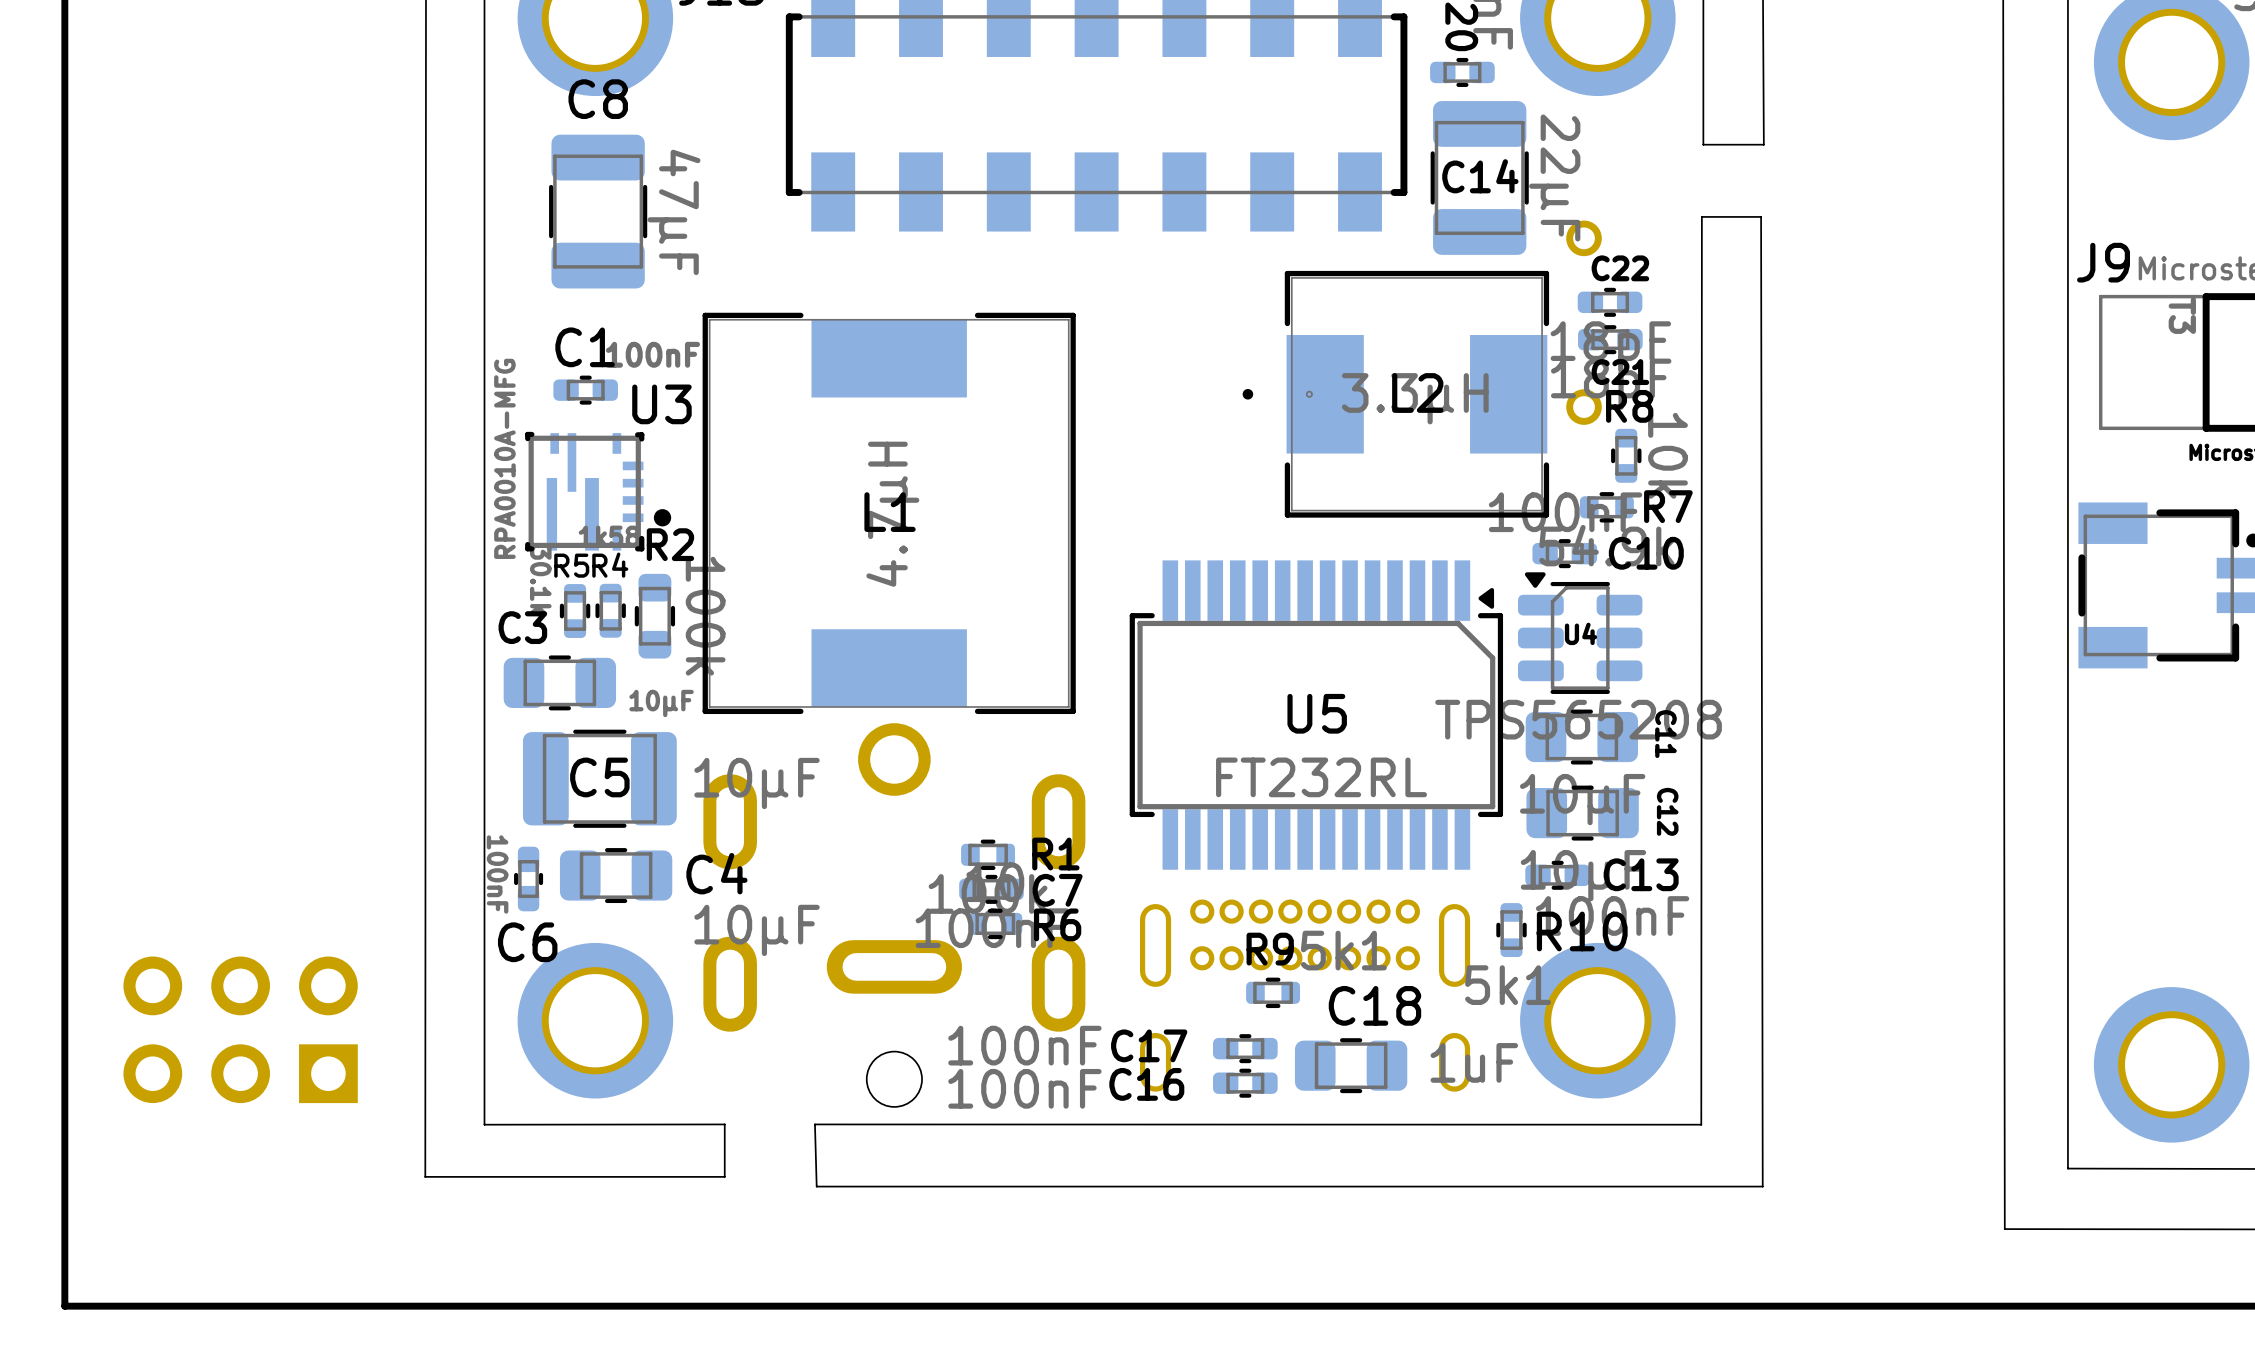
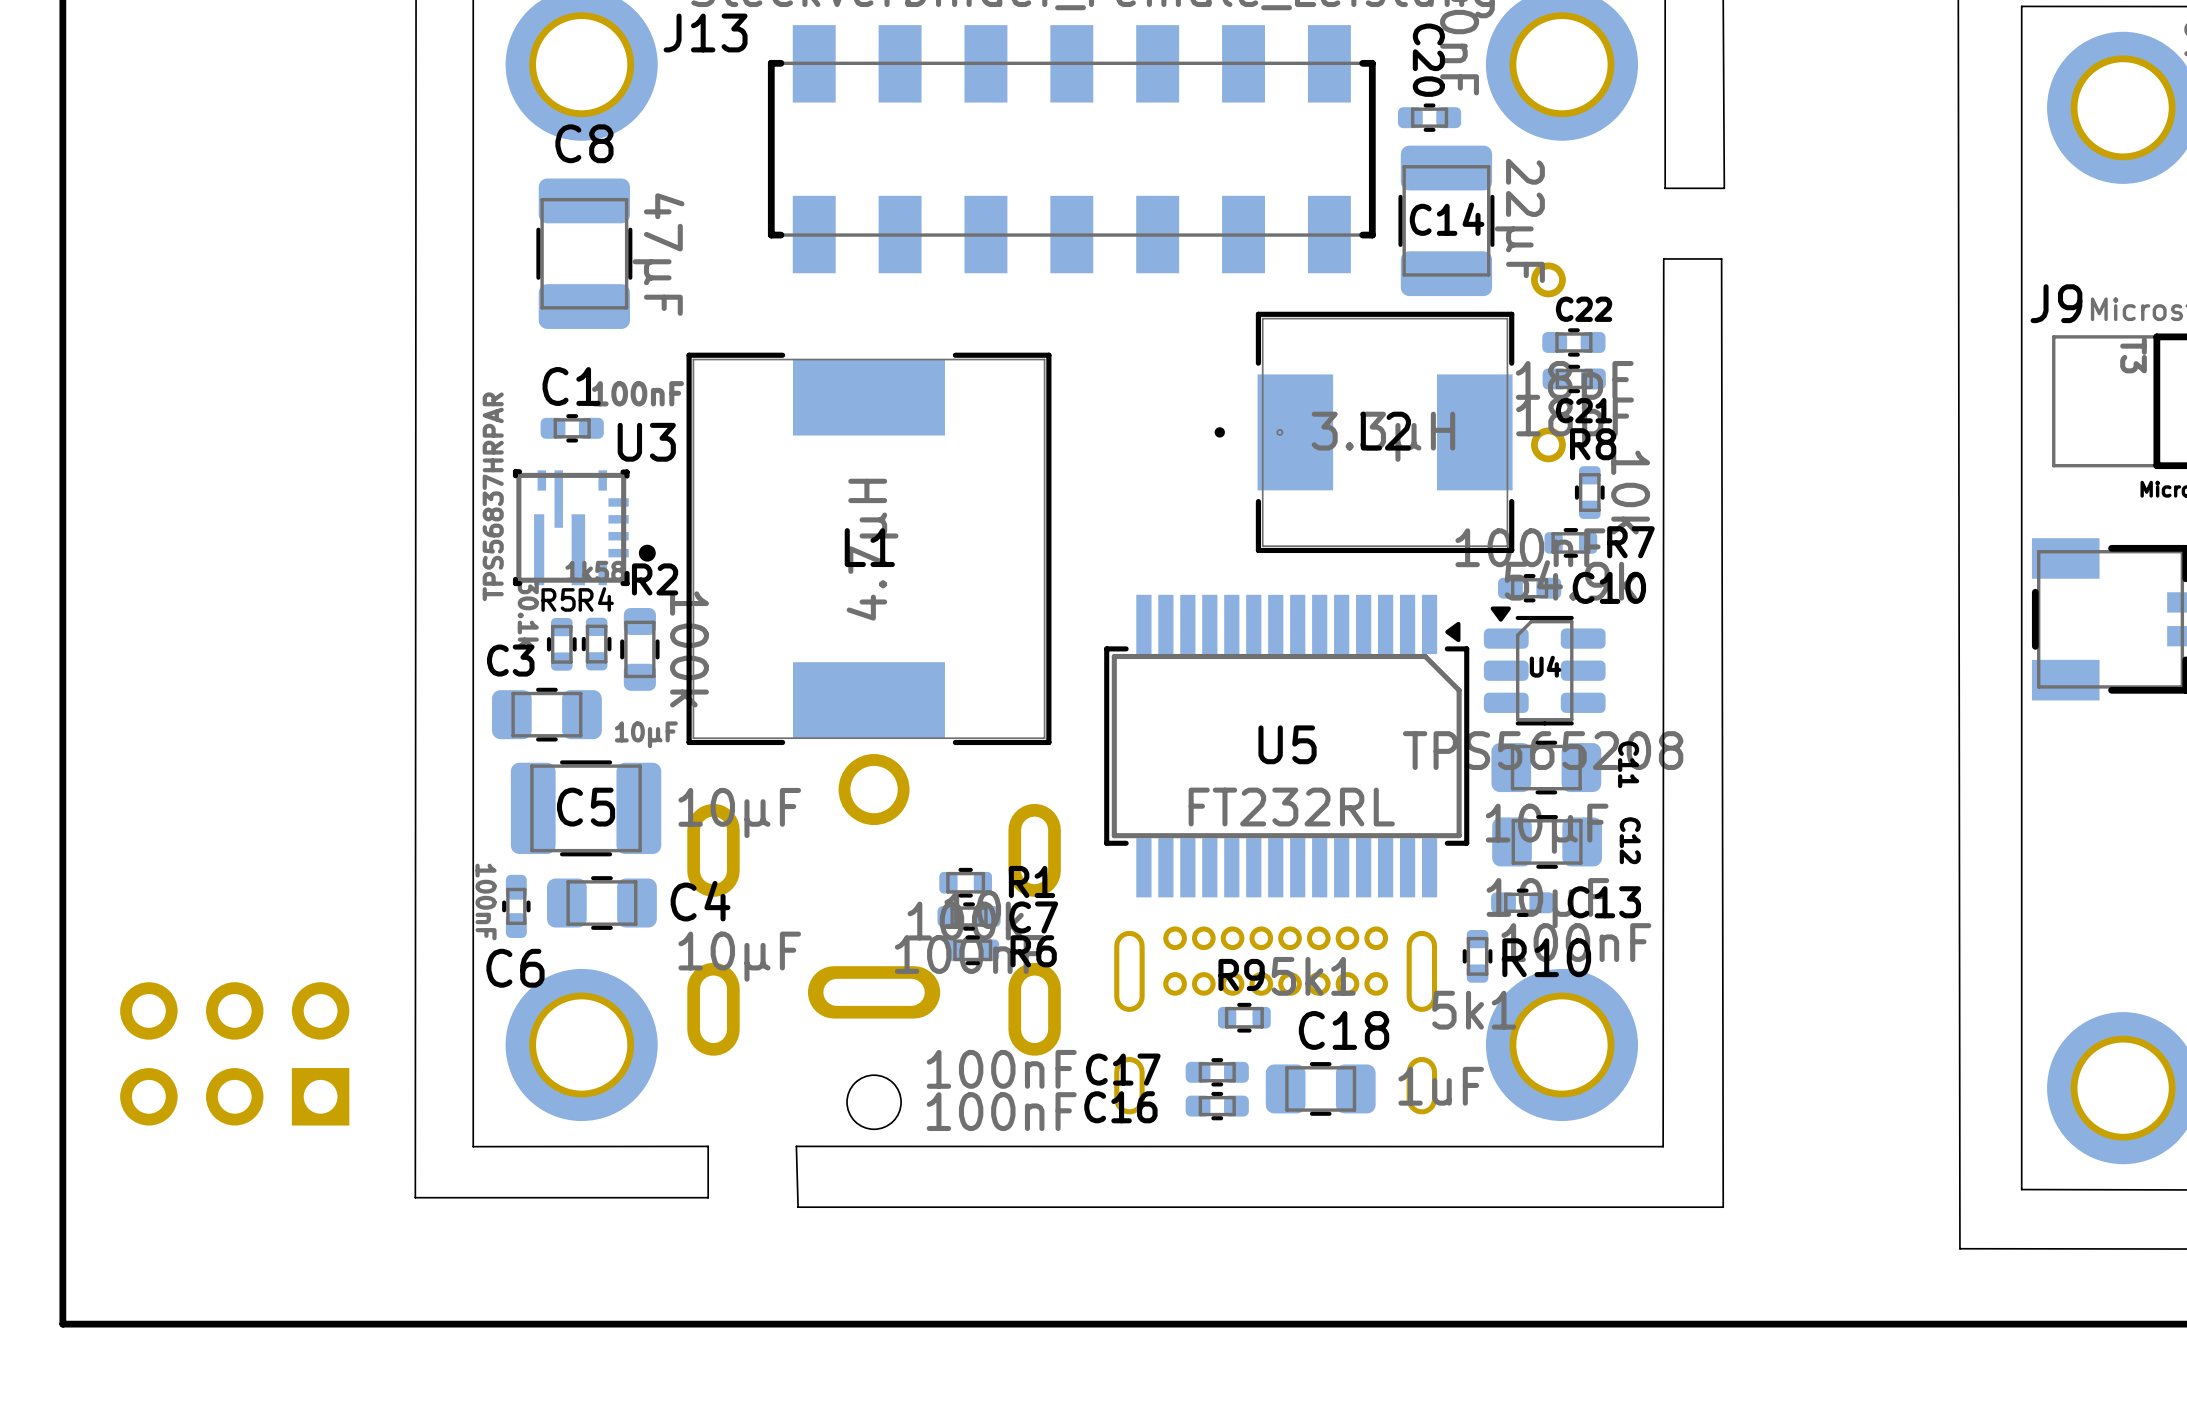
U3 value: RPA0010A-MFG (504, 458) -> TPS56837HRPAR (493, 496)

